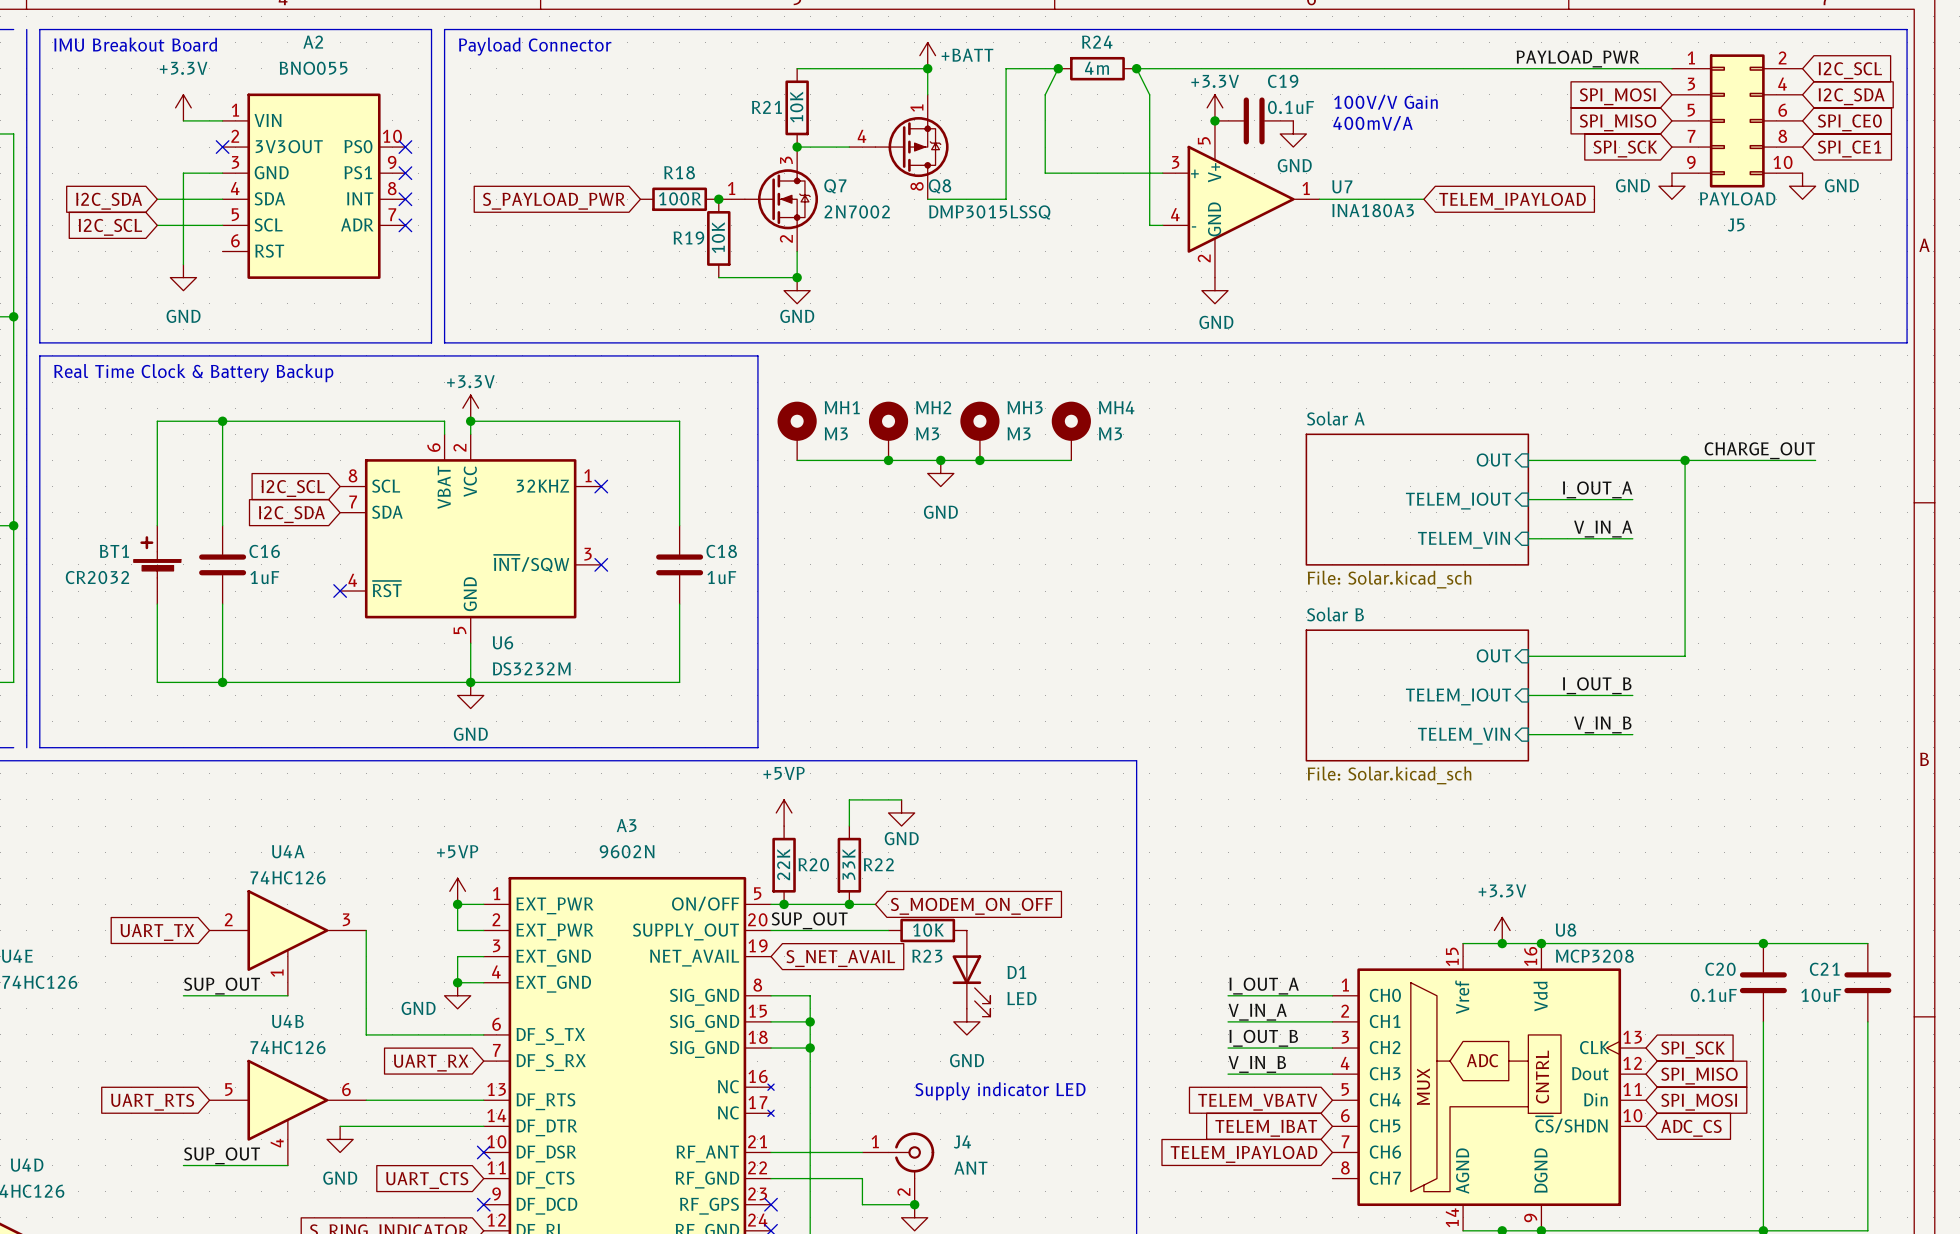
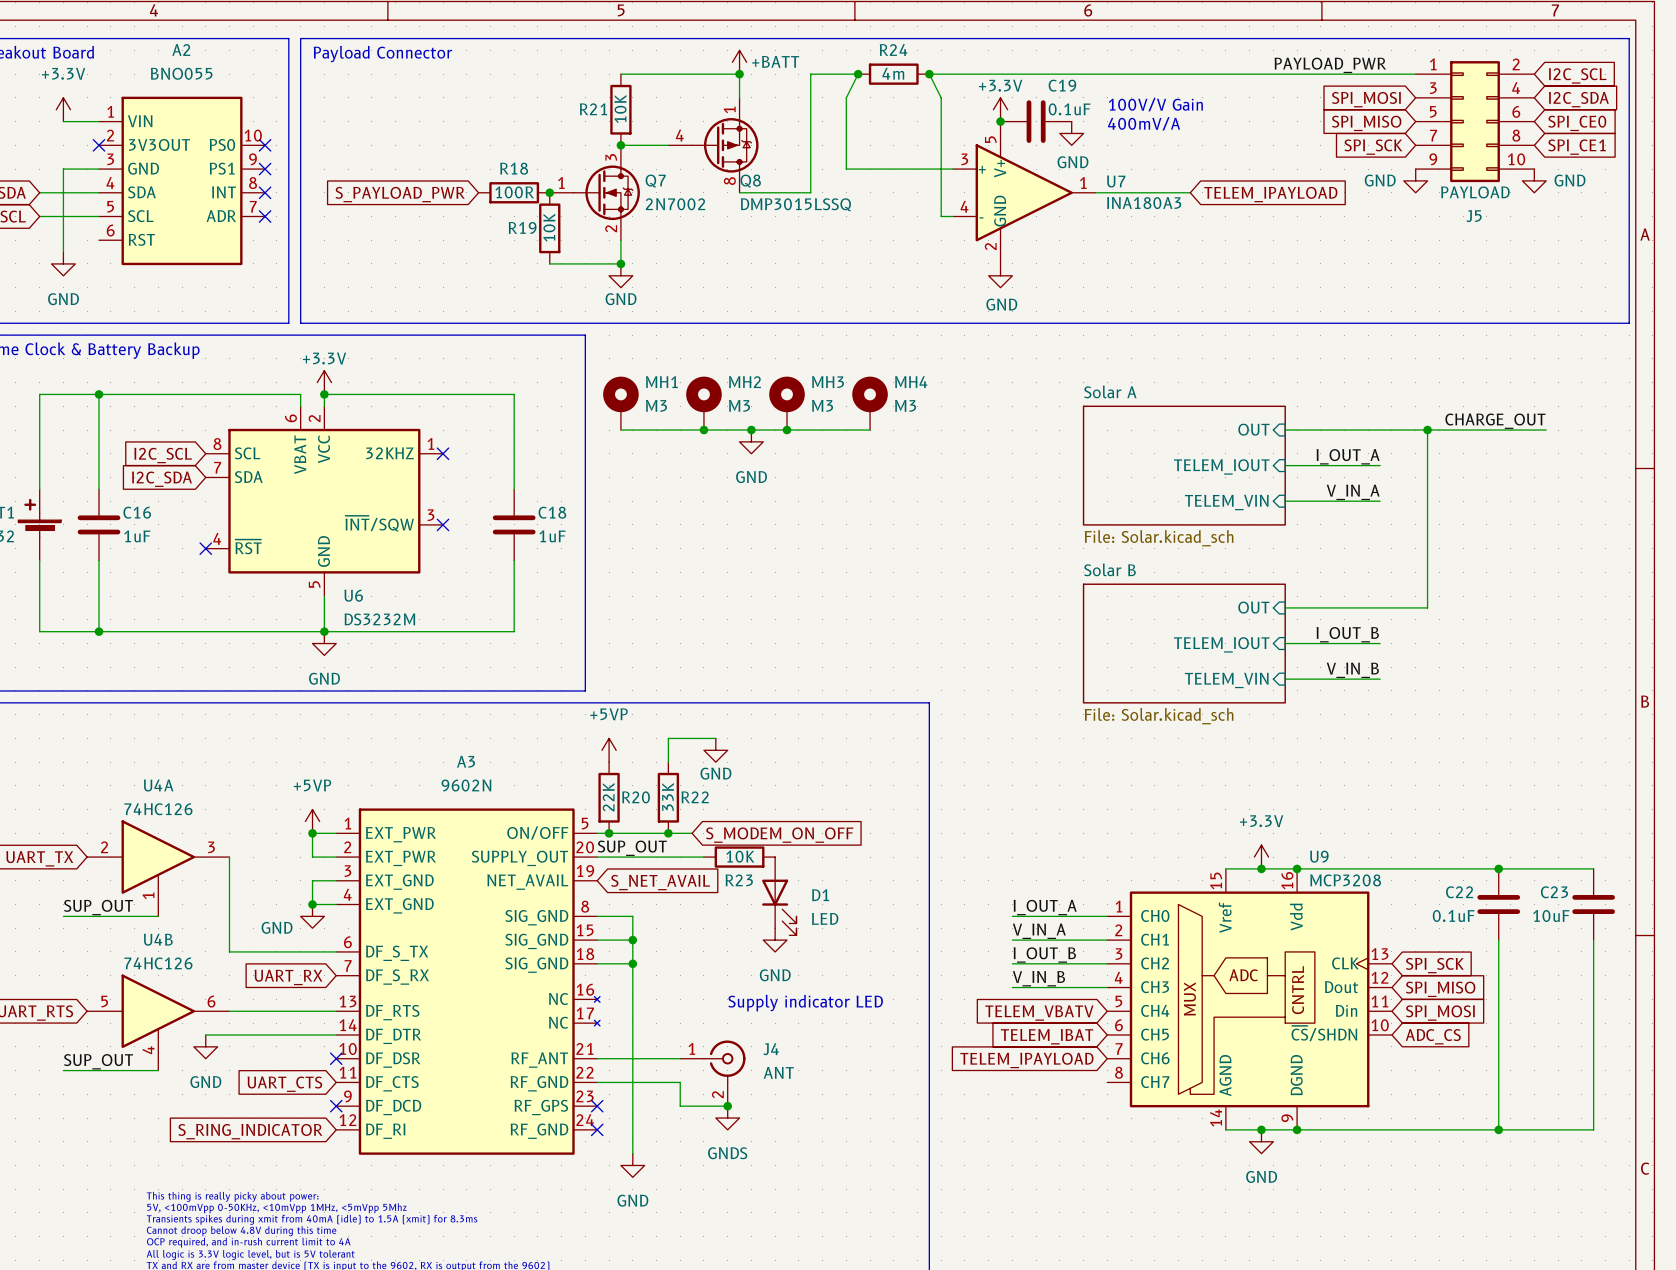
U8 name: U8 (1565, 930) -> U9 (1319, 856)
C20 name: C20 (1720, 969) -> C22 (1459, 892)
C21 name: C21 (1824, 969) -> C23 (1554, 892)

